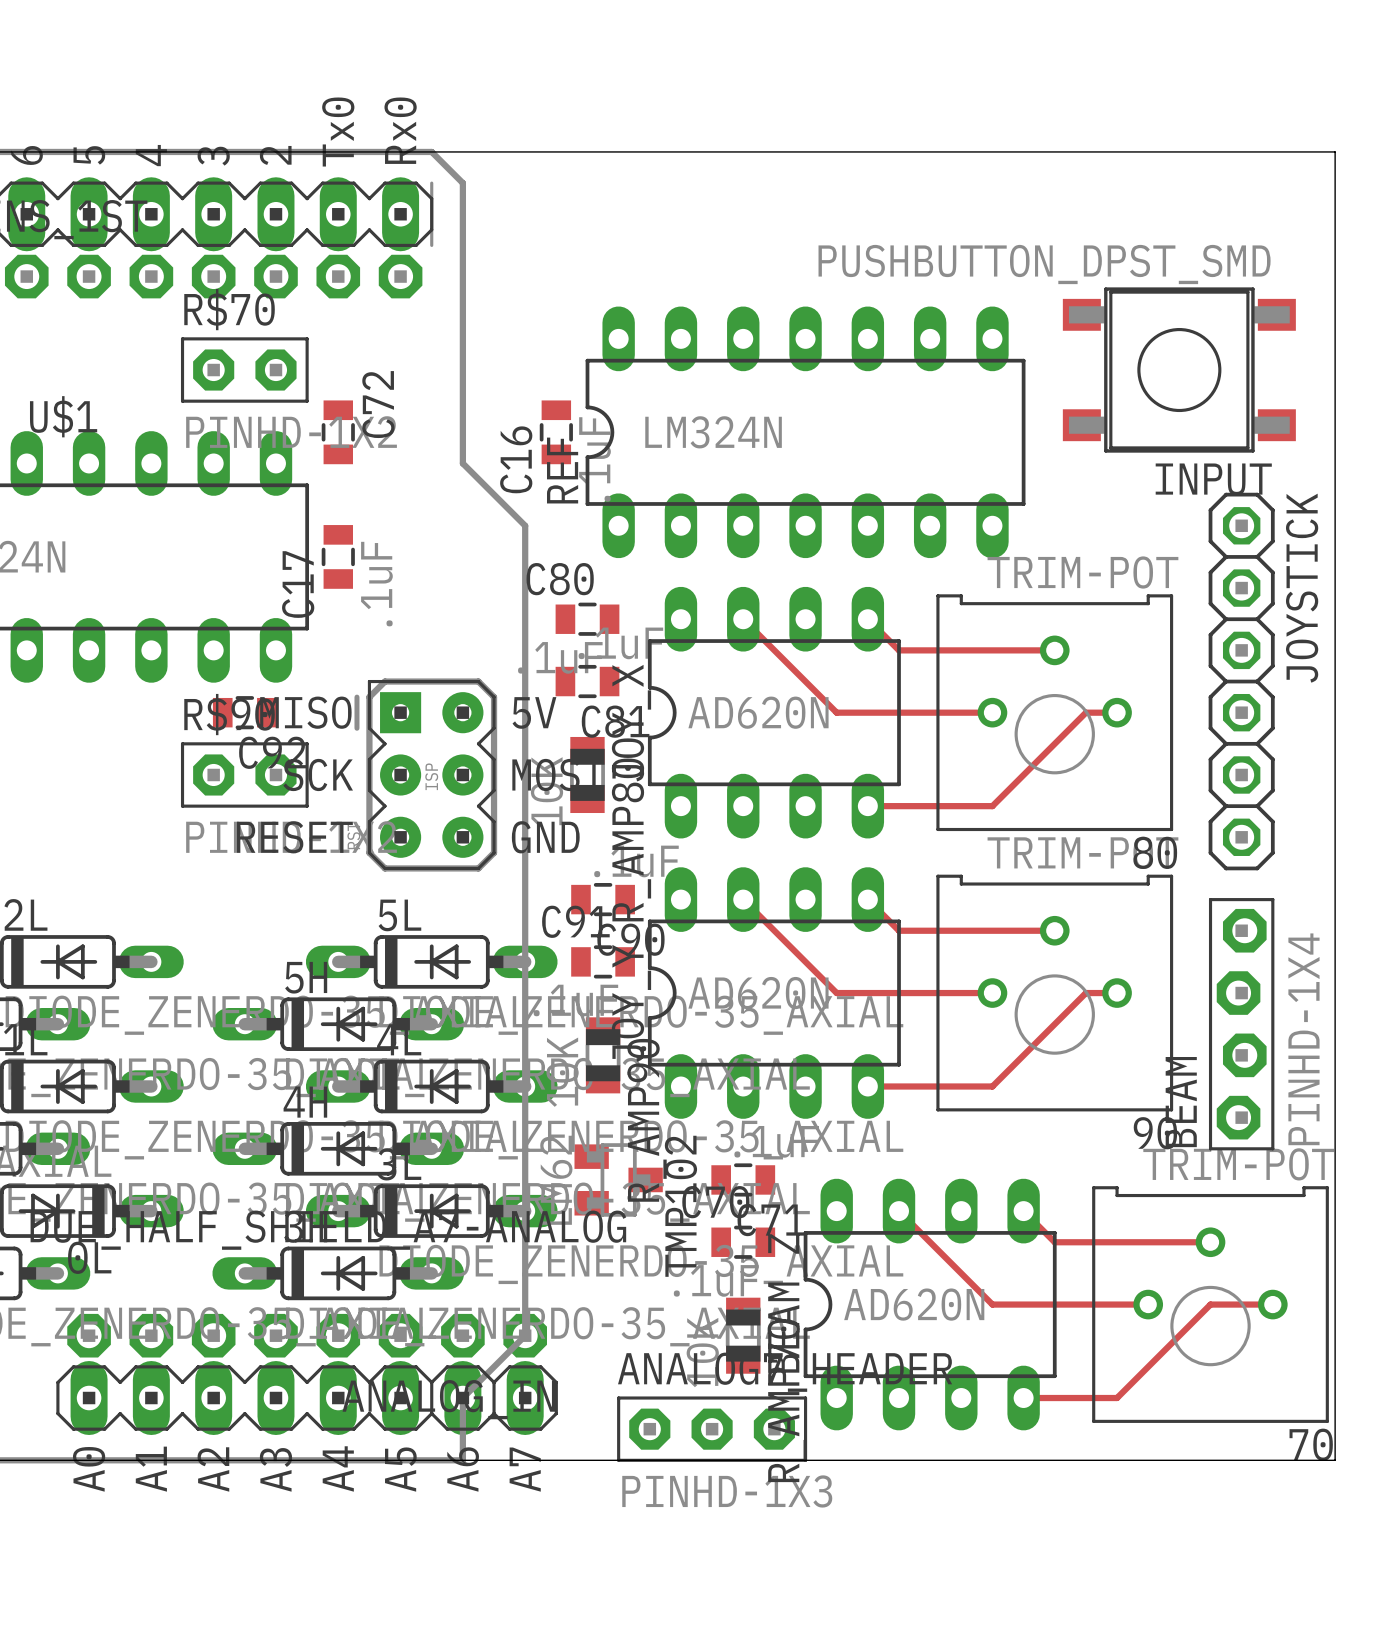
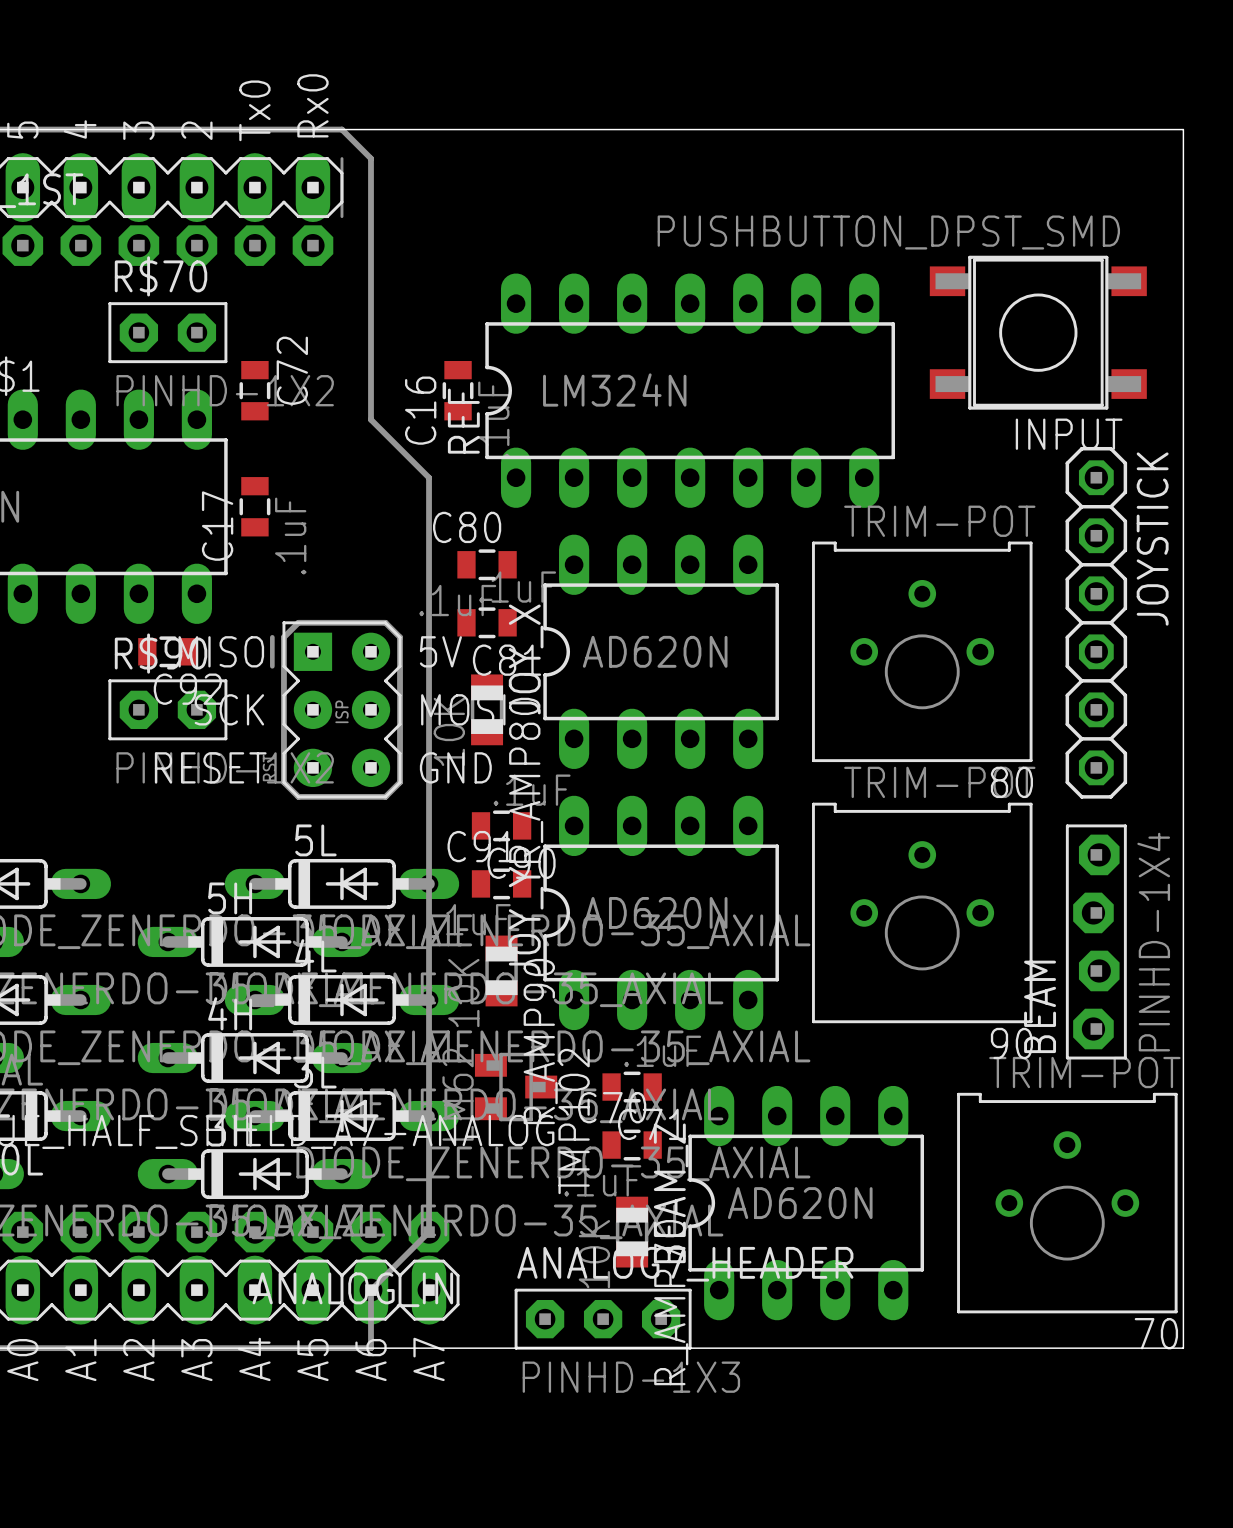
track: (743, 619) (836, 712) (992, 712) -> none
track: (867, 619) (899, 650) (1054, 650) -> none
track: (1117, 712) (1085, 712) (992, 806) (867, 806) -> none
track: (743, 899) (836, 993) (992, 993) -> none
track: (867, 899) (899, 930) (1054, 930) -> none
track: (1117, 993) (1085, 993) (992, 1086) (867, 1086) -> none
track: (899, 1211) (992, 1304) (1148, 1304) -> none
track: (1023, 1211) (1054, 1242) (1210, 1242) -> none
track: (1272, 1304) (1210, 1304) (1117, 1398) (1023, 1398) -> none

